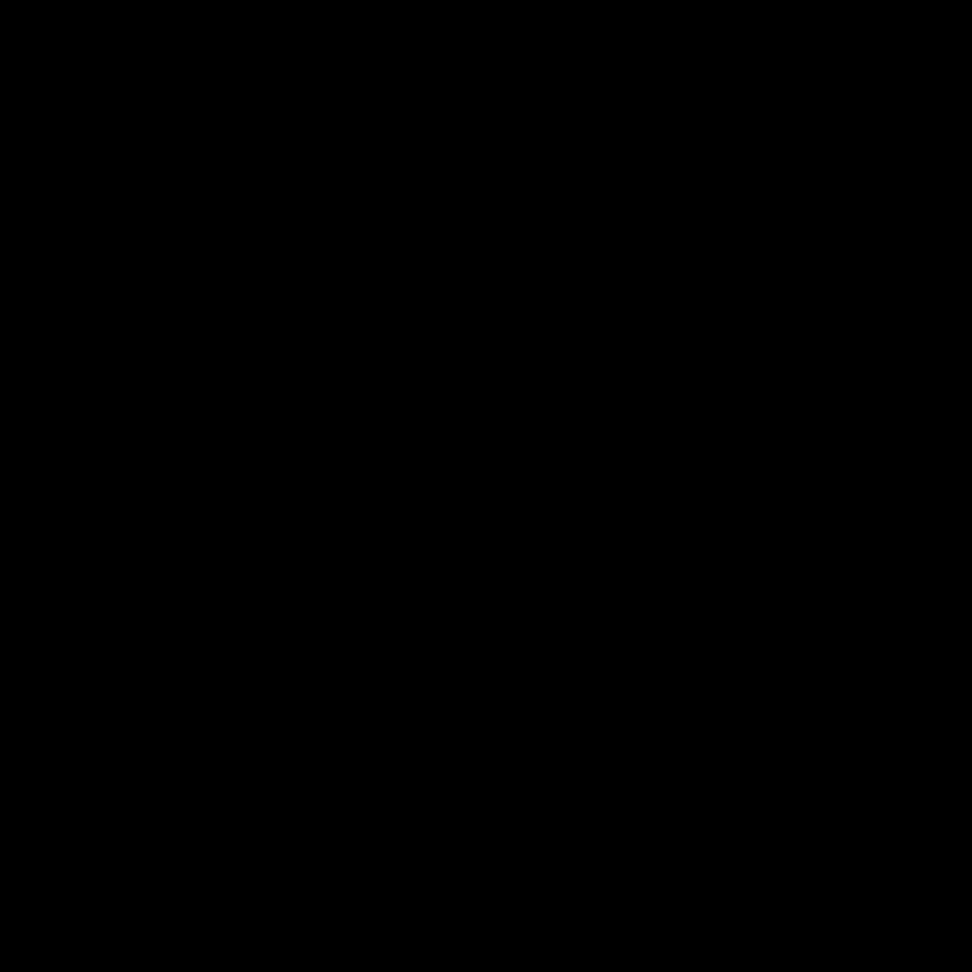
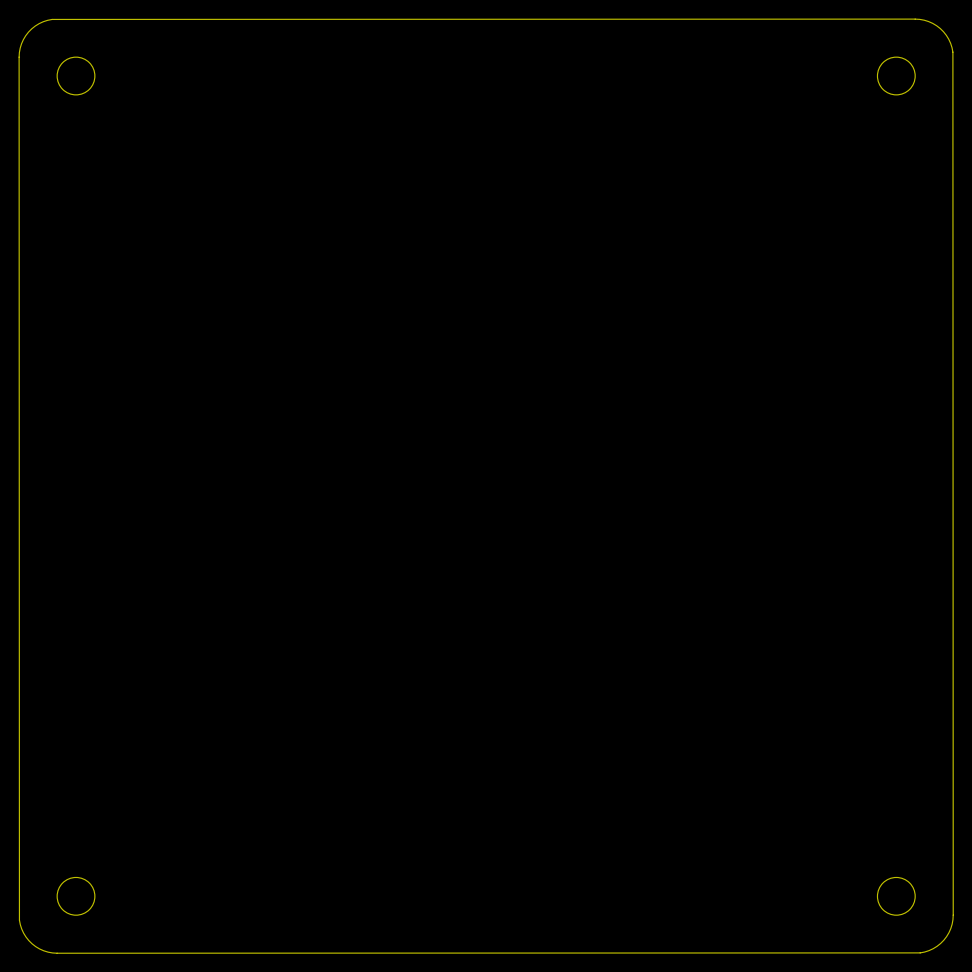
board edge: none -> (915, 19) (52, 19) (39, 23) (28, 32) (21, 43) (19, 57) (19, 920) (23, 933) (32, 943) (43, 950) (57, 953) (920, 952) (933, 948) (943, 940) (950, 928) (953, 915) (952, 52) (948, 39) (940, 28) (928, 21) (915, 19)
round board edge: none -> [56, 56, 96, 96]
round board edge: none -> [877, 56, 916, 96]
round board edge: none -> [56, 877, 96, 916]
round board edge: none -> [877, 877, 916, 916]

